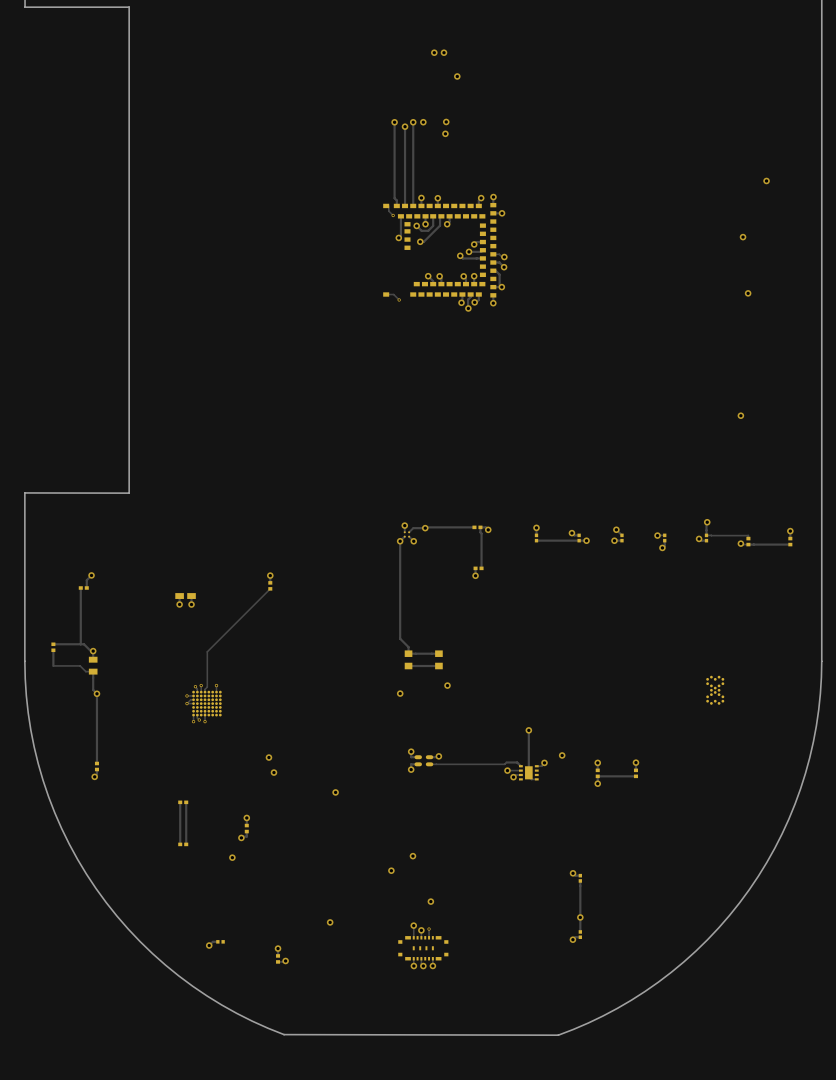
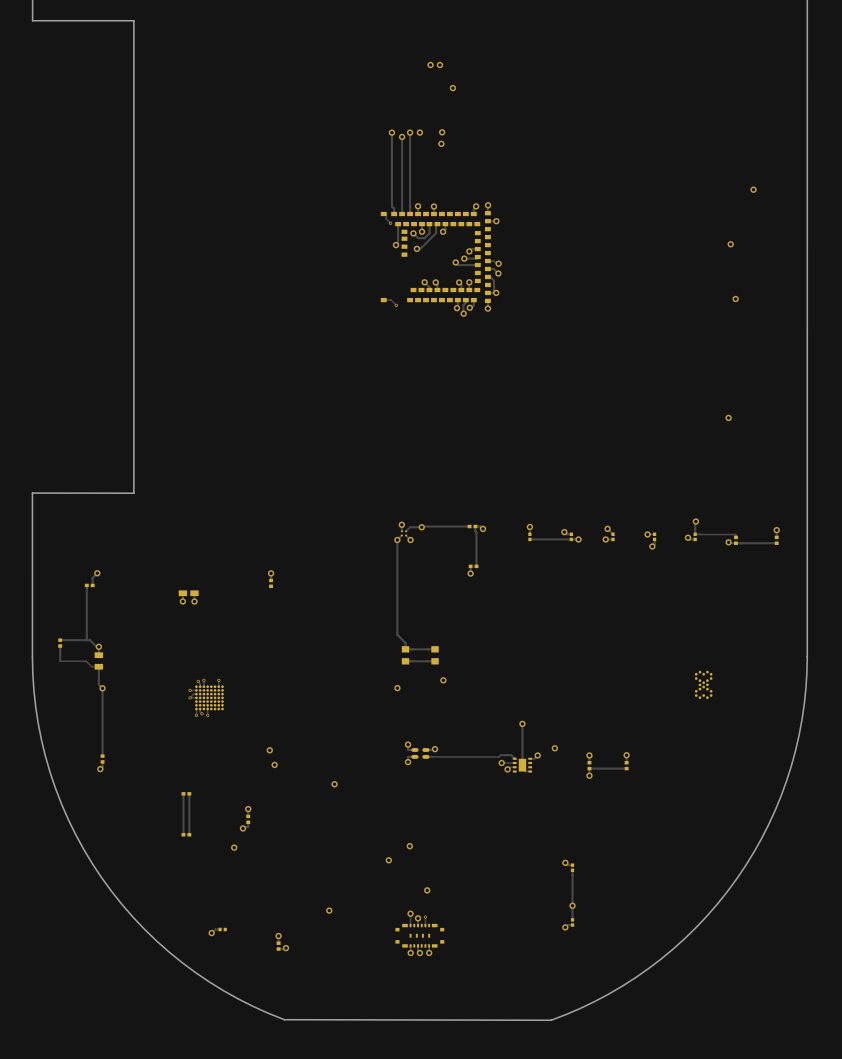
track: (270, 588) (207, 651) (207, 687) (205, 690) -> none

